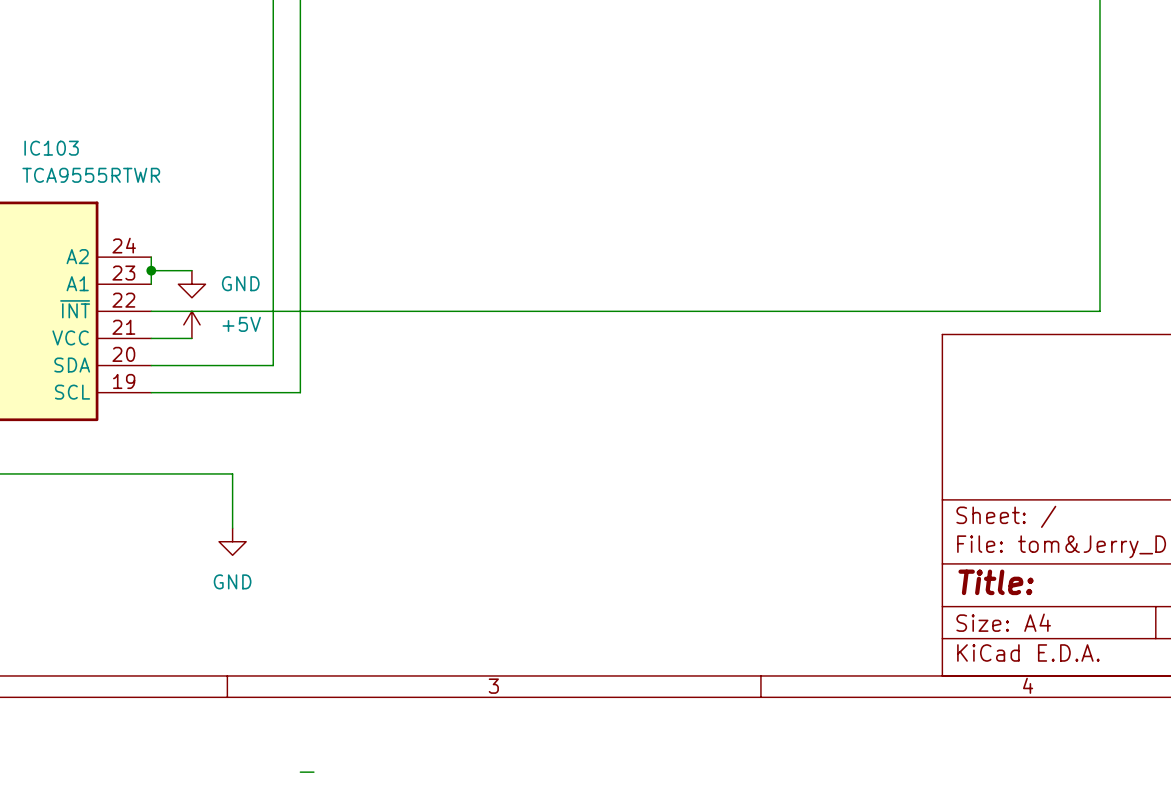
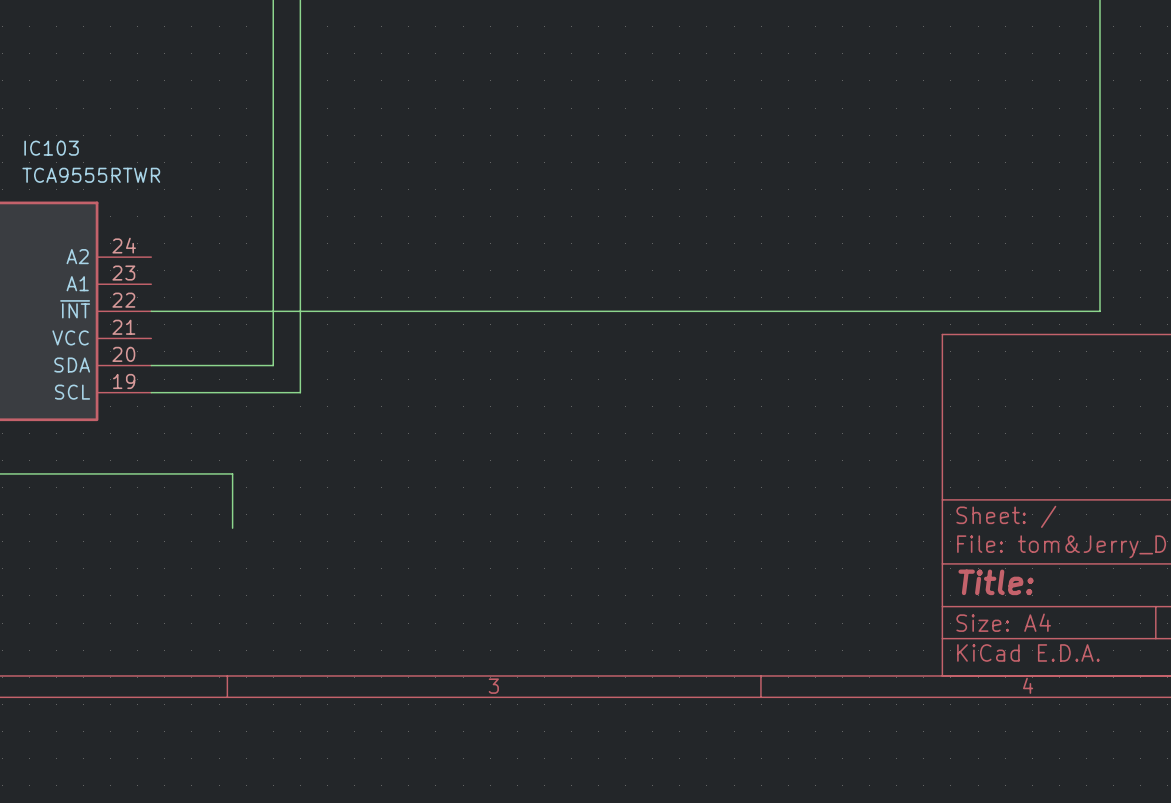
wire: (151, 257) (151, 284) -> none
wire: (151, 270) (191, 270) -> none
junction: (151, 270) -> none
power symbol: GND (191, 284) -> none
power symbol: +5V (191, 324) -> none
wire: (151, 338) (191, 338) -> none
power symbol: GND (232, 541) -> none
wire: (300, 772) (313, 772) -> none

